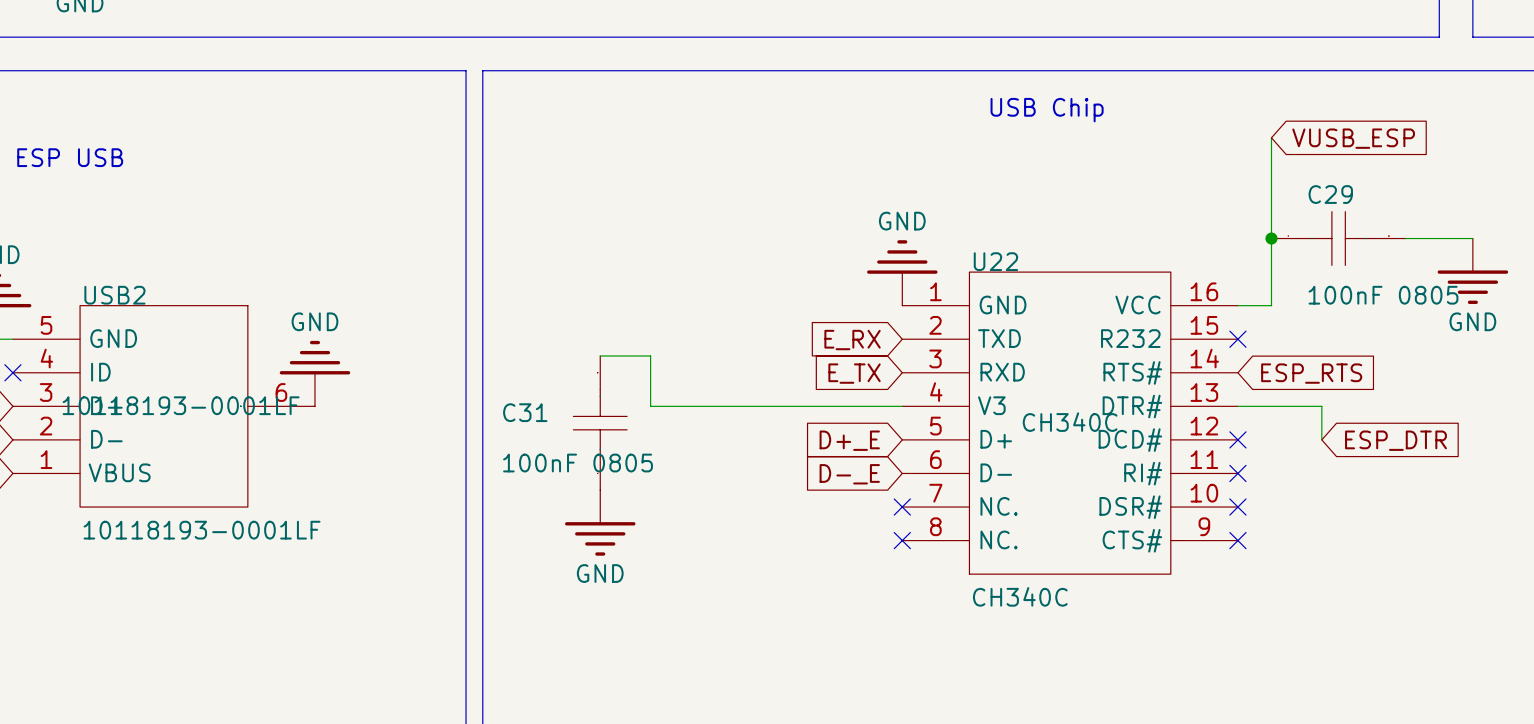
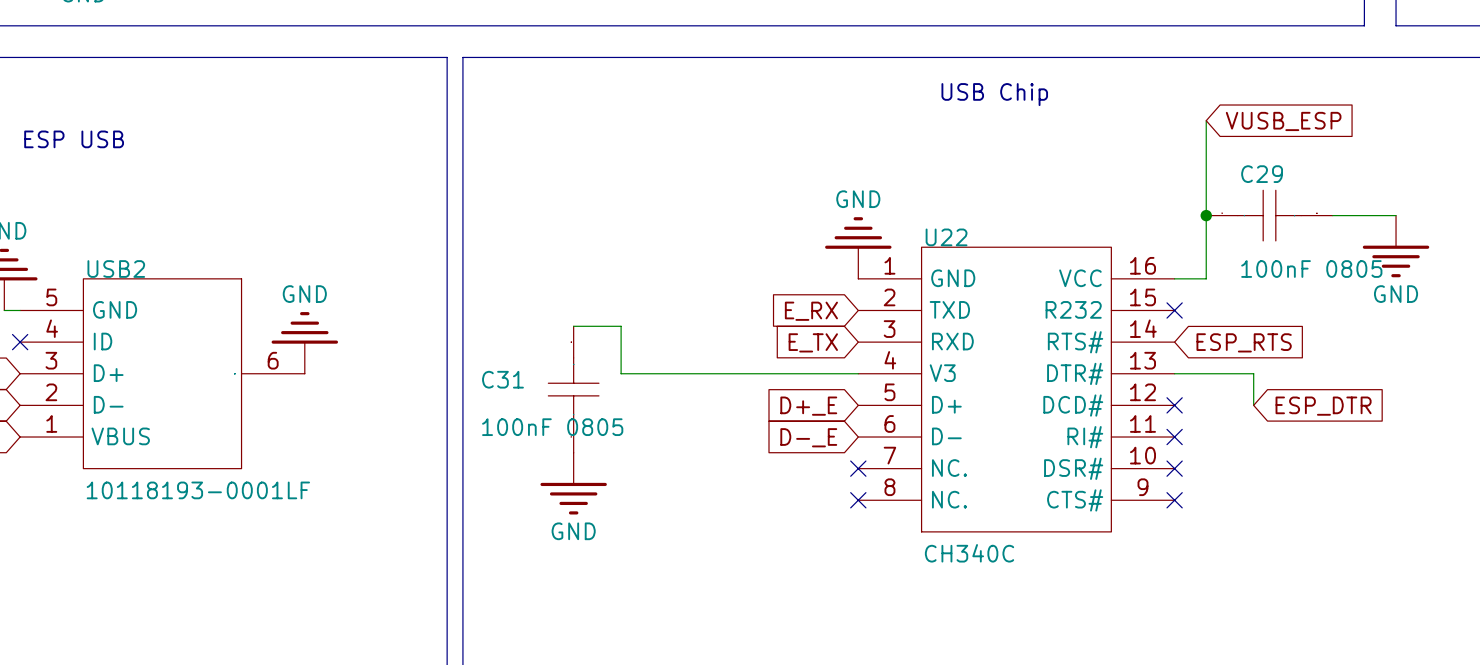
USB2 text: 10118193-0001LF (181, 405) -> none
U22 text: CH340C (1070, 422) -> none

